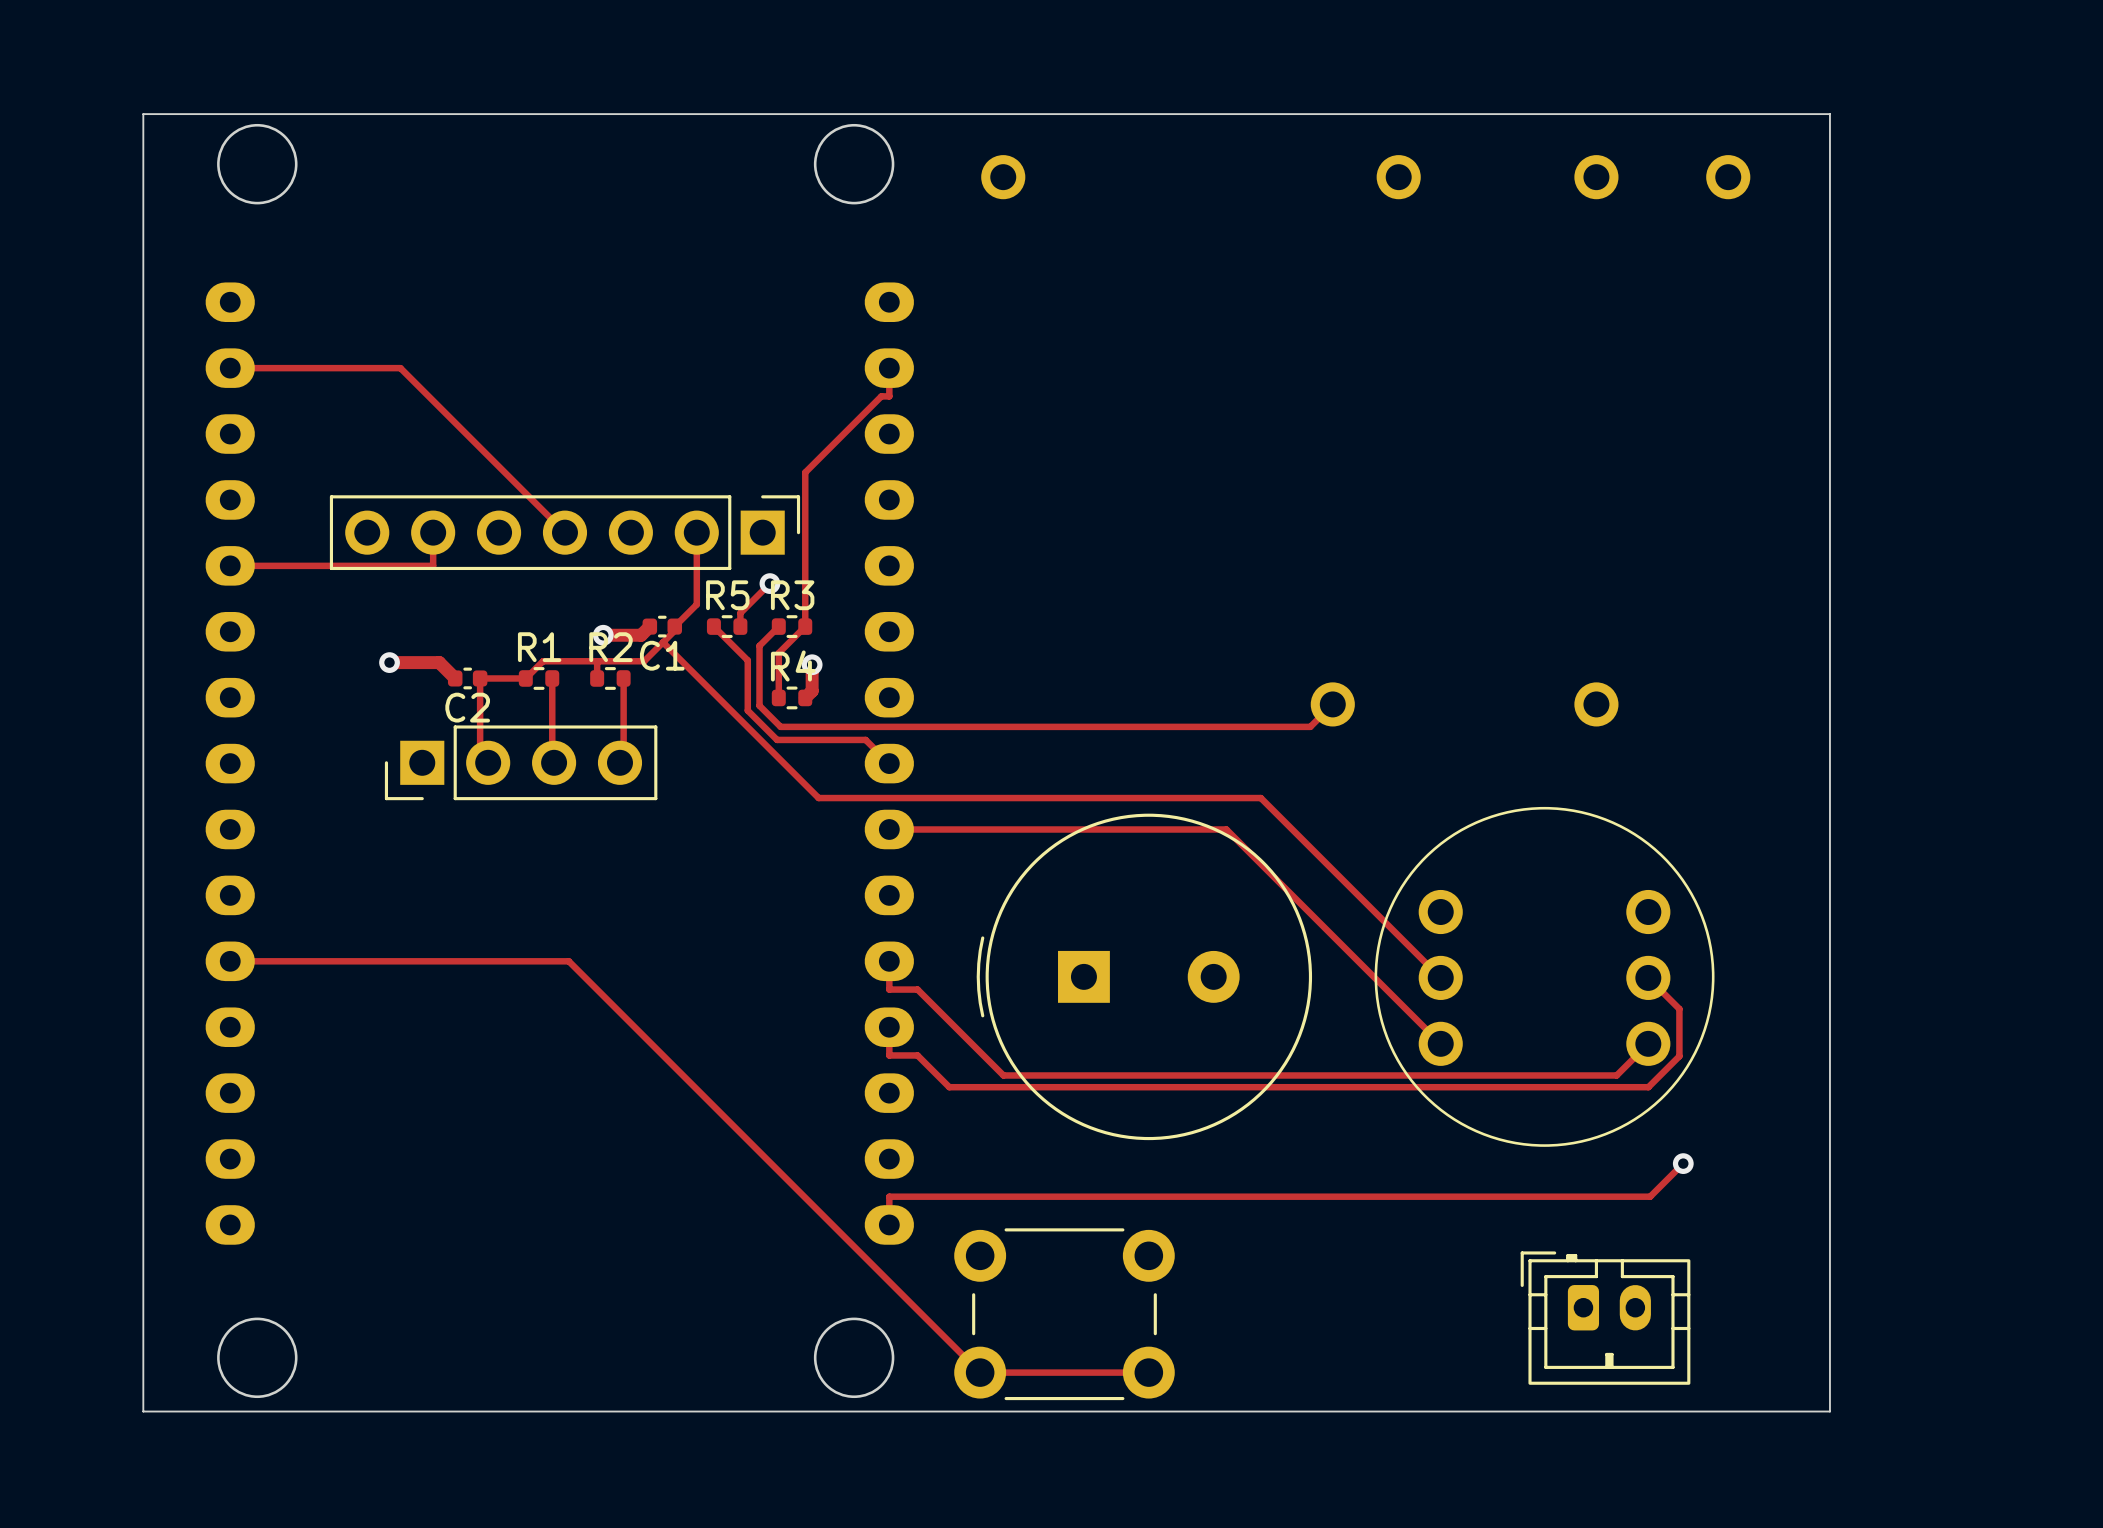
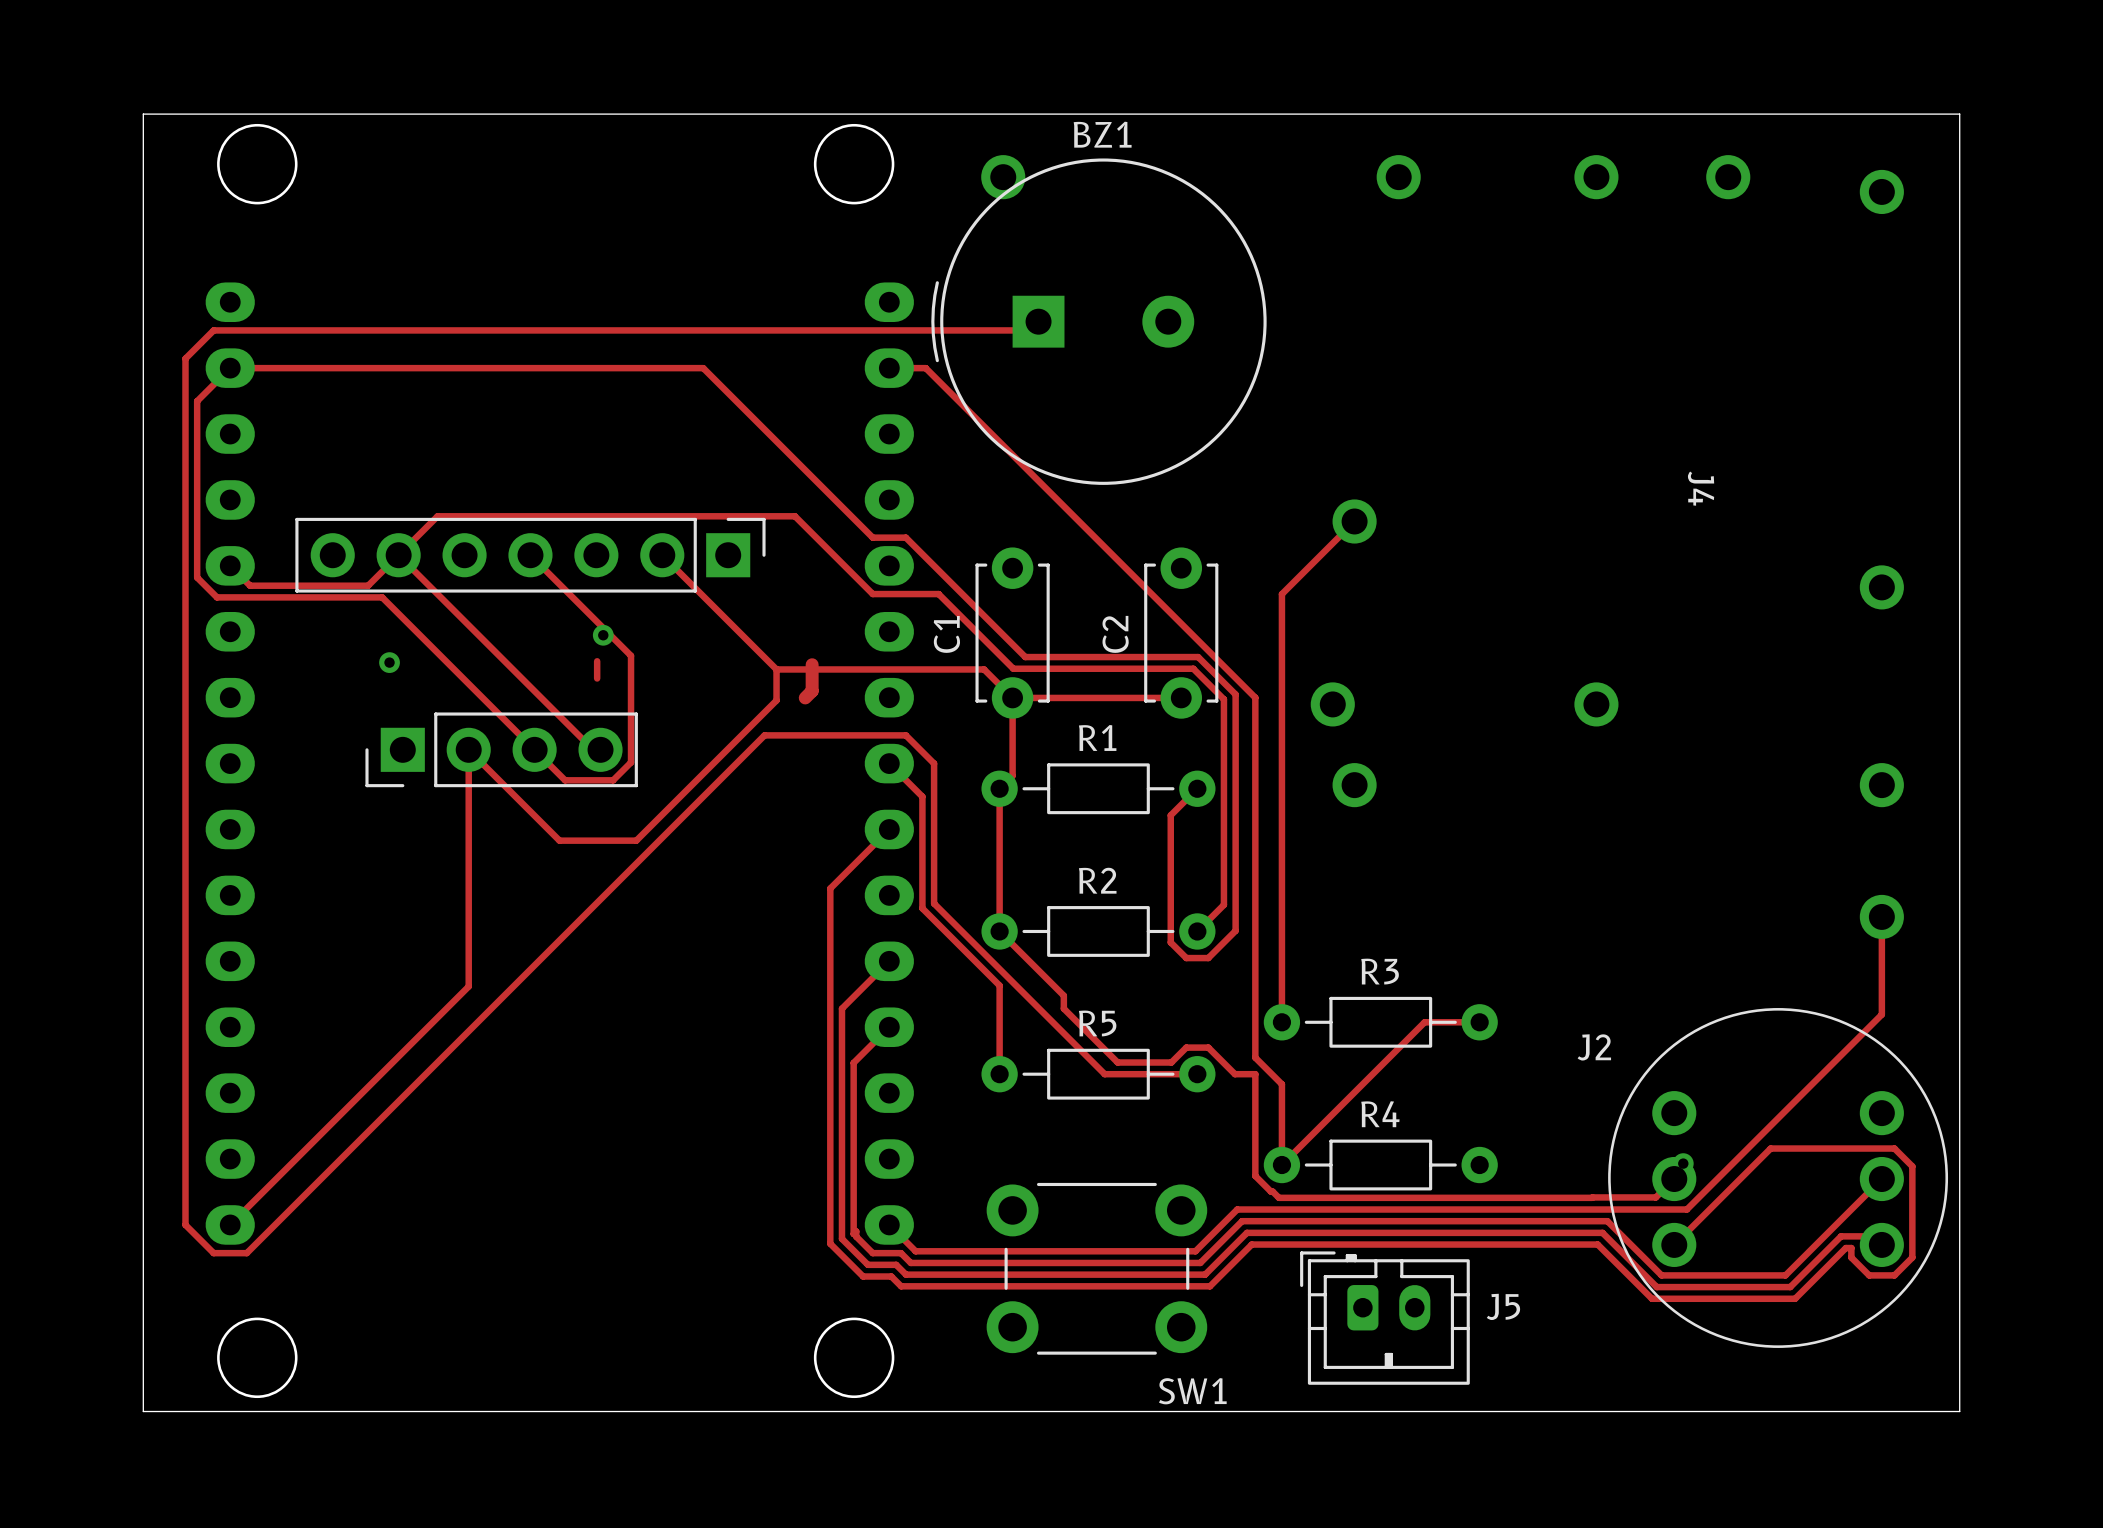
board edge: (1829, 114) (1829, 1411) -> (1829, 114) (1959, 114) (1959, 1411) (1829, 1411)
track: none -> (1038, 321) (1029, 330) (213, 330) (185, 358) (185, 1224) (213, 1253) (246, 1253) (764, 735) (905, 735) (934, 763) (934, 903) (1104, 1074) (1197, 1074)
BZ1: none -> (1098, 321)
track: none -> (230, 368) (197, 401) (197, 577) (217, 597) (382, 597) (565, 780) (613, 780) (631, 762) (631, 655) (530, 555)
track: (400, 368) (564, 532) -> (400, 368) (703, 368) (872, 537) (905, 537) (1025, 657) (1198, 657) (1235, 694) (1235, 930) (1208, 958) (1186, 958) (1170, 942) (1170, 815) (1197, 788)
track: (889, 368) (889, 396) (881, 396) (805, 472) (805, 626) (778, 653) (778, 697) -> (889, 368) (925, 368) (1255, 697) (1255, 1057) (1281, 1084) (1281, 1165) (1424, 1022) (1479, 1022)
track: none -> (1354, 521) (1281, 594) (1281, 1022)
track: (433, 532) (433, 565) (230, 565) -> (1197, 931) (1223, 904) (1223, 699) (1193, 668) (1013, 668) (938, 594) (872, 594) (795, 516) (437, 516) (368, 585) (250, 585) (230, 565)
part position: (564, 532) -> (530, 555)
track: (696, 532) (696, 604) (674, 626) (674, 630) (644, 661) (543, 661) (525, 678) (480, 678) (480, 754) (488, 762) -> none
J4: none -> (1618, 554)
track: none -> (398, 555) (593, 749) (600, 749)
track: none -> (662, 555) (776, 669)
track: (769, 583) (740, 613) (740, 626) -> none
via: (769, 583) -> none
C1 footprint: [642, 615, 683, 638] -> [975, 547, 1050, 719]
R5 footprint: [706, 615, 748, 639] -> [981, 1048, 1216, 1100]
R3 footprint: [771, 615, 813, 639] -> [1263, 996, 1498, 1048]
track: (649, 626) (641, 635) (603, 635) -> none
track: (713, 626) (747, 660) (747, 710) (777, 739) (865, 739) (889, 763) -> (999, 1074) (999, 985) (922, 908) (922, 796) (889, 763)
track: (778, 626) (759, 645) (759, 705) (780, 726) (1310, 726) (1332, 704) -> none
track: (663, 642) (818, 798) (1260, 798) (1440, 977) -> none
C1 name position: C1 (662, 655) -> C1 (946, 634)
track: (389, 662) (439, 662) (455, 678) -> none
via: (812, 664) -> none
C2 footprint: [447, 667, 488, 690] -> [1144, 547, 1219, 719]
R1 footprint: [518, 667, 560, 690] -> [981, 763, 1216, 815]
R2 footprint: [590, 667, 631, 690] -> [981, 906, 1216, 957]
track: none -> (776, 669) (776, 700) (636, 840) (559, 840) (468, 749) (468, 986) (230, 1224)
track: none -> (776, 669) (984, 669) (1012, 697)
track: (552, 678) (552, 760) (554, 762) -> none
track: (623, 678) (623, 759) (619, 762) -> none
R4 footprint: [771, 686, 813, 710] -> [1263, 1139, 1498, 1191]
track: none -> (1012, 697) (1181, 697)
track: none -> (1012, 697) (1012, 775) (999, 788) (999, 931) (1063, 995) (1063, 1008) (1117, 1062) (1171, 1062) (1186, 1047) (1208, 1047) (1234, 1074) (1255, 1074) (1255, 1176) (1278, 1197) (1655, 1197) (1674, 1179)
C2 name position: C2 (467, 707) -> C2 (1115, 634)
part position: (521, 762) -> (501, 749)
track: (889, 829) (1226, 829) (1440, 1043) -> (889, 829) (830, 888) (830, 1243) (863, 1276) (891, 1276) (901, 1286) (1210, 1286) (1251, 1244) (1597, 1244) (1651, 1298) (1795, 1298) (1845, 1248) (1851, 1248) (1851, 1257) (1869, 1275) (1894, 1275) (1912, 1257) (1912, 1166) (1894, 1148) (1770, 1148) (1674, 1244)
track: (230, 961) (568, 961) (980, 1372) (1148, 1372) -> none
track: (889, 961) (889, 989) (917, 989) (1003, 1075) (1616, 1075) (1648, 1043) -> (889, 961) (841, 1008) (841, 1238) (867, 1264) (896, 1264) (906, 1274) (1205, 1274) (1246, 1232) (1602, 1232) (1656, 1287) (1790, 1287) (1841, 1236) (1873, 1236) (1881, 1244)
part: (1144, 976) -> none
part: (1544, 976) -> none
track: (1648, 977) (1679, 1009) (1679, 1056) (1648, 1087) (949, 1087) (917, 1055) (889, 1055) (889, 1027) -> (1881, 1179) (1785, 1275) (1661, 1275) (1607, 1221) (1242, 1221) (1200, 1262) (910, 1262) (901, 1253) (872, 1253) (856, 1236) (856, 1231) (853, 1234) (853, 1062) (889, 1027)
track: (1683, 1163) (1650, 1196) (889, 1196) (889, 1224) -> (1881, 916) (1881, 1014) (1686, 1209) (1237, 1209) (1195, 1251) (915, 1251) (889, 1224)
J2: none -> (1778, 1177)
SW1: none -> (1096, 1268)
part: (1064, 1314) -> none
J5: none -> (1384, 1318)
part: (1605, 1318) -> none

